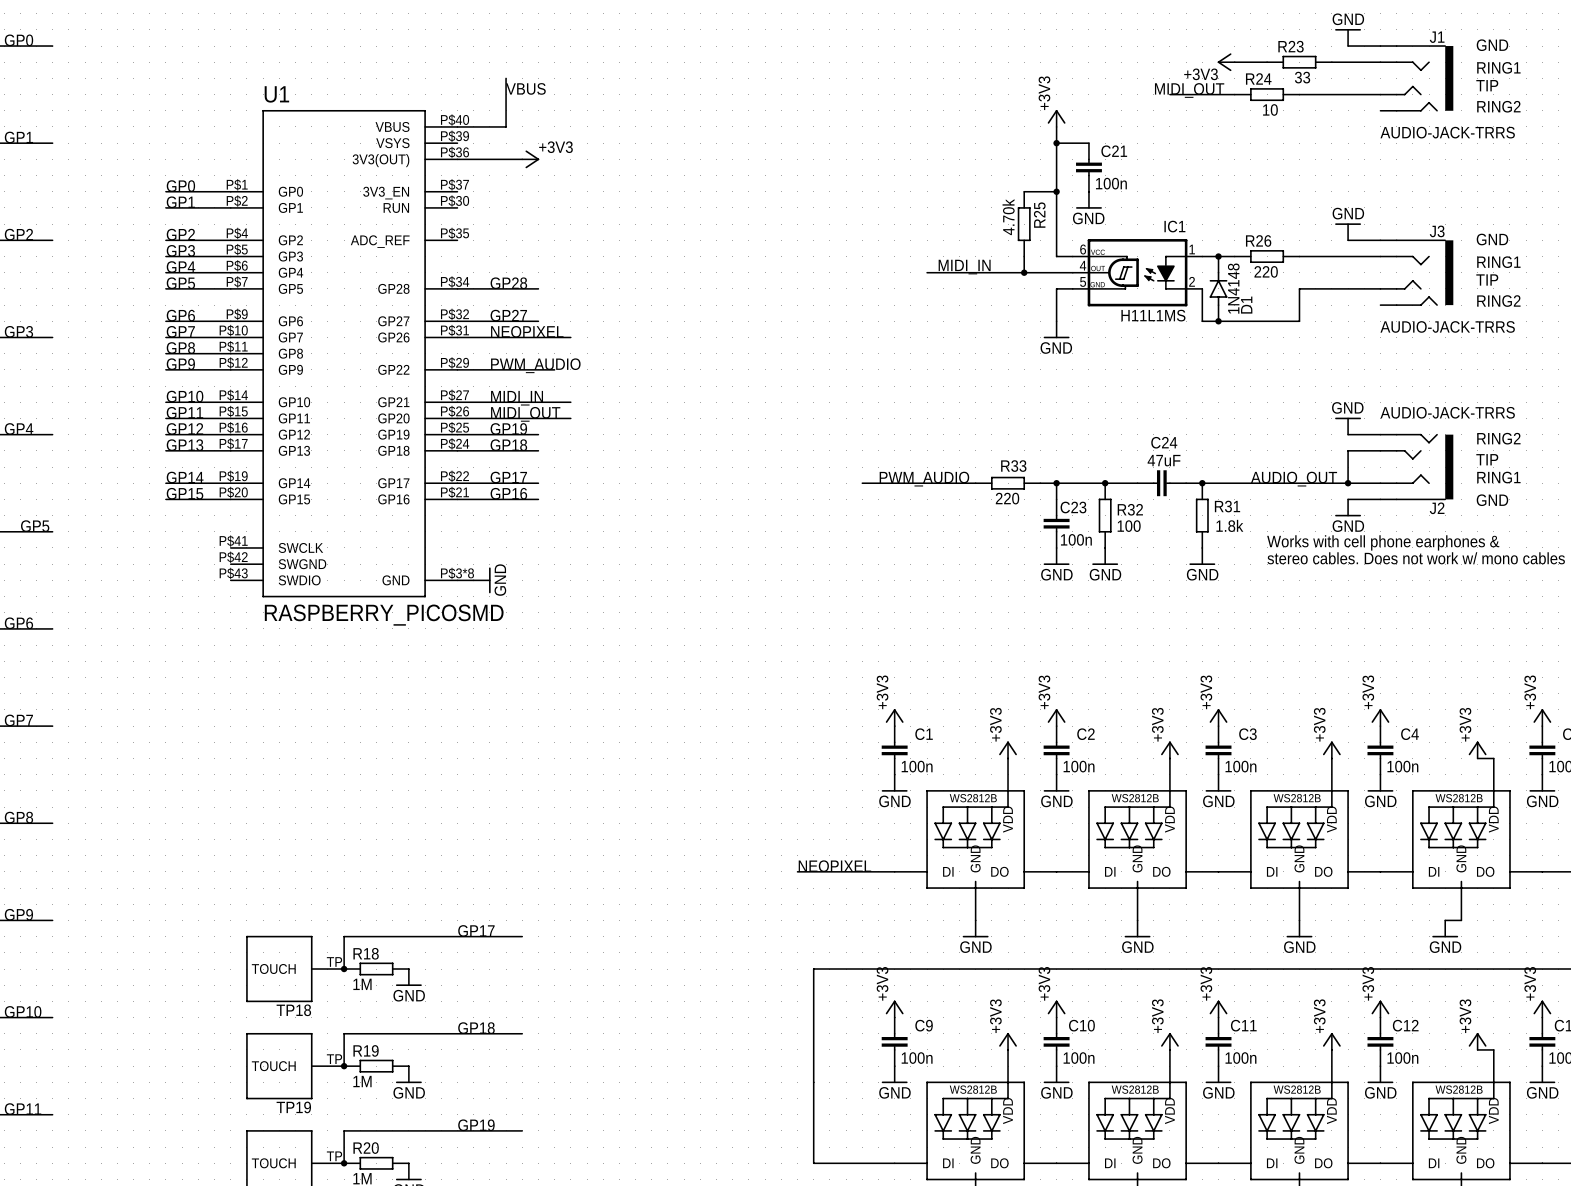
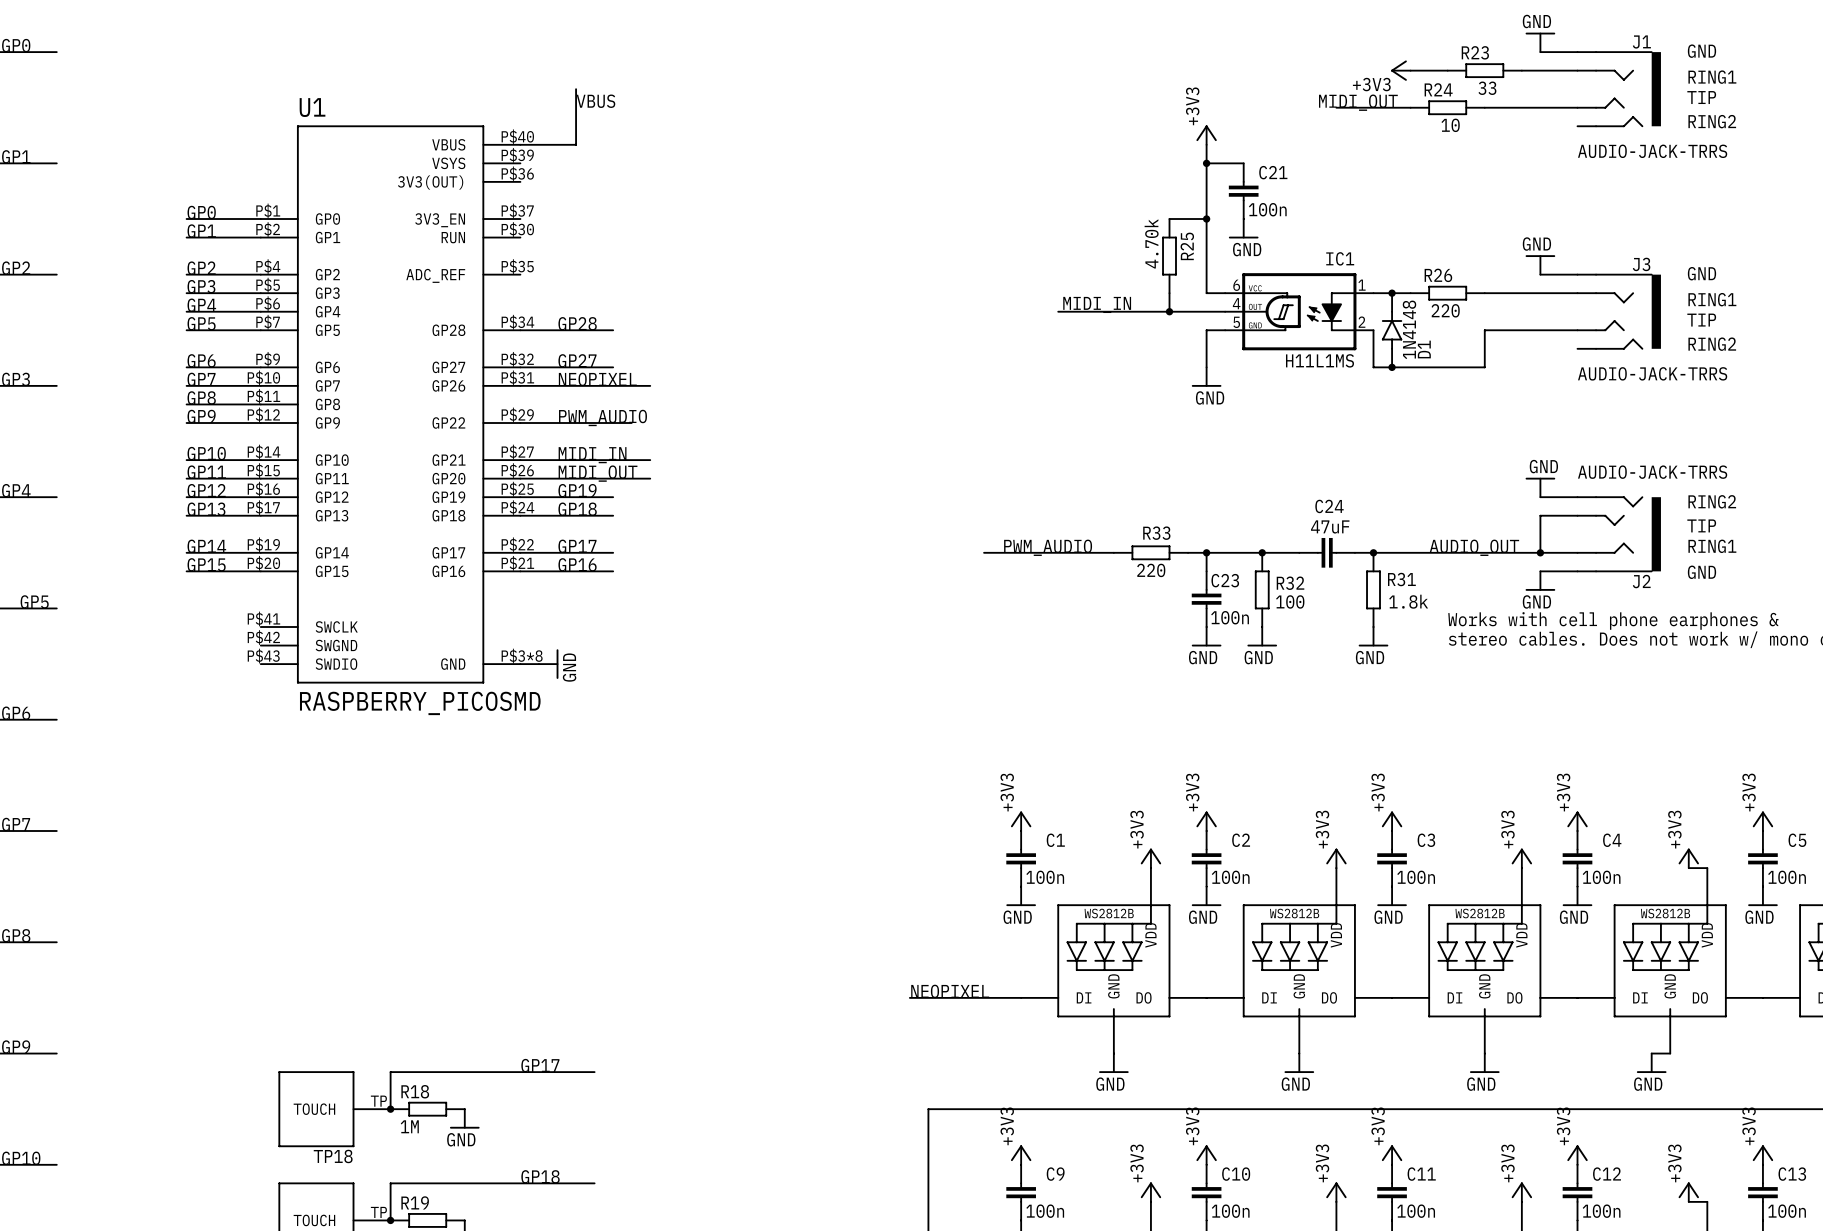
wire: (457, 159) (522, 159) -> none
power symbol: +3V3 (530, 159) -> none

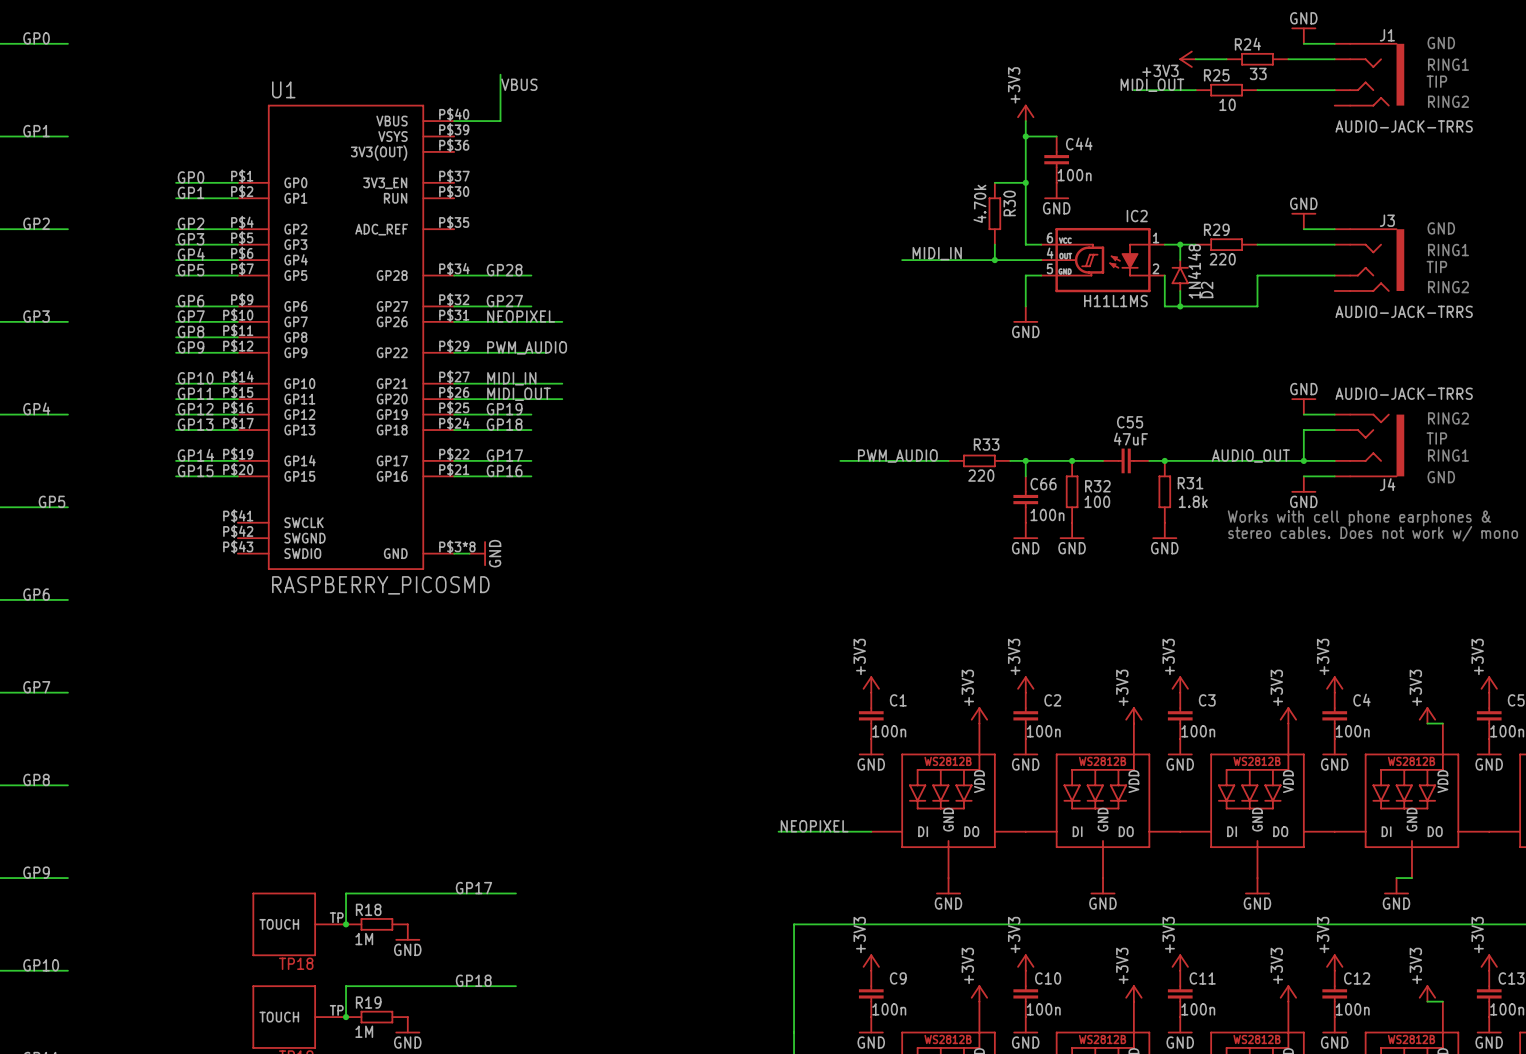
R23 name: R23 (1475, 52) -> R24 (1247, 44)
R24 name: R24 (1438, 89) -> R25 (1216, 75)
C21 name: C21 (1273, 172) -> C44 (1079, 143)
R25 name: R25 (1187, 246) -> R30 (1009, 203)
IC1 name: IC1 (1340, 258) -> IC2 (1137, 216)
R26 name: R26 (1438, 275) -> R29 (1216, 229)
D1 name: D1 (1424, 349) -> D2 (1207, 289)
C24 name: C24 (1329, 506) -> C55 (1130, 422)
C23 name: C23 (1225, 580) -> C66 (1043, 484)
J2 name: J2 (1641, 581) -> J4 (1387, 484)

